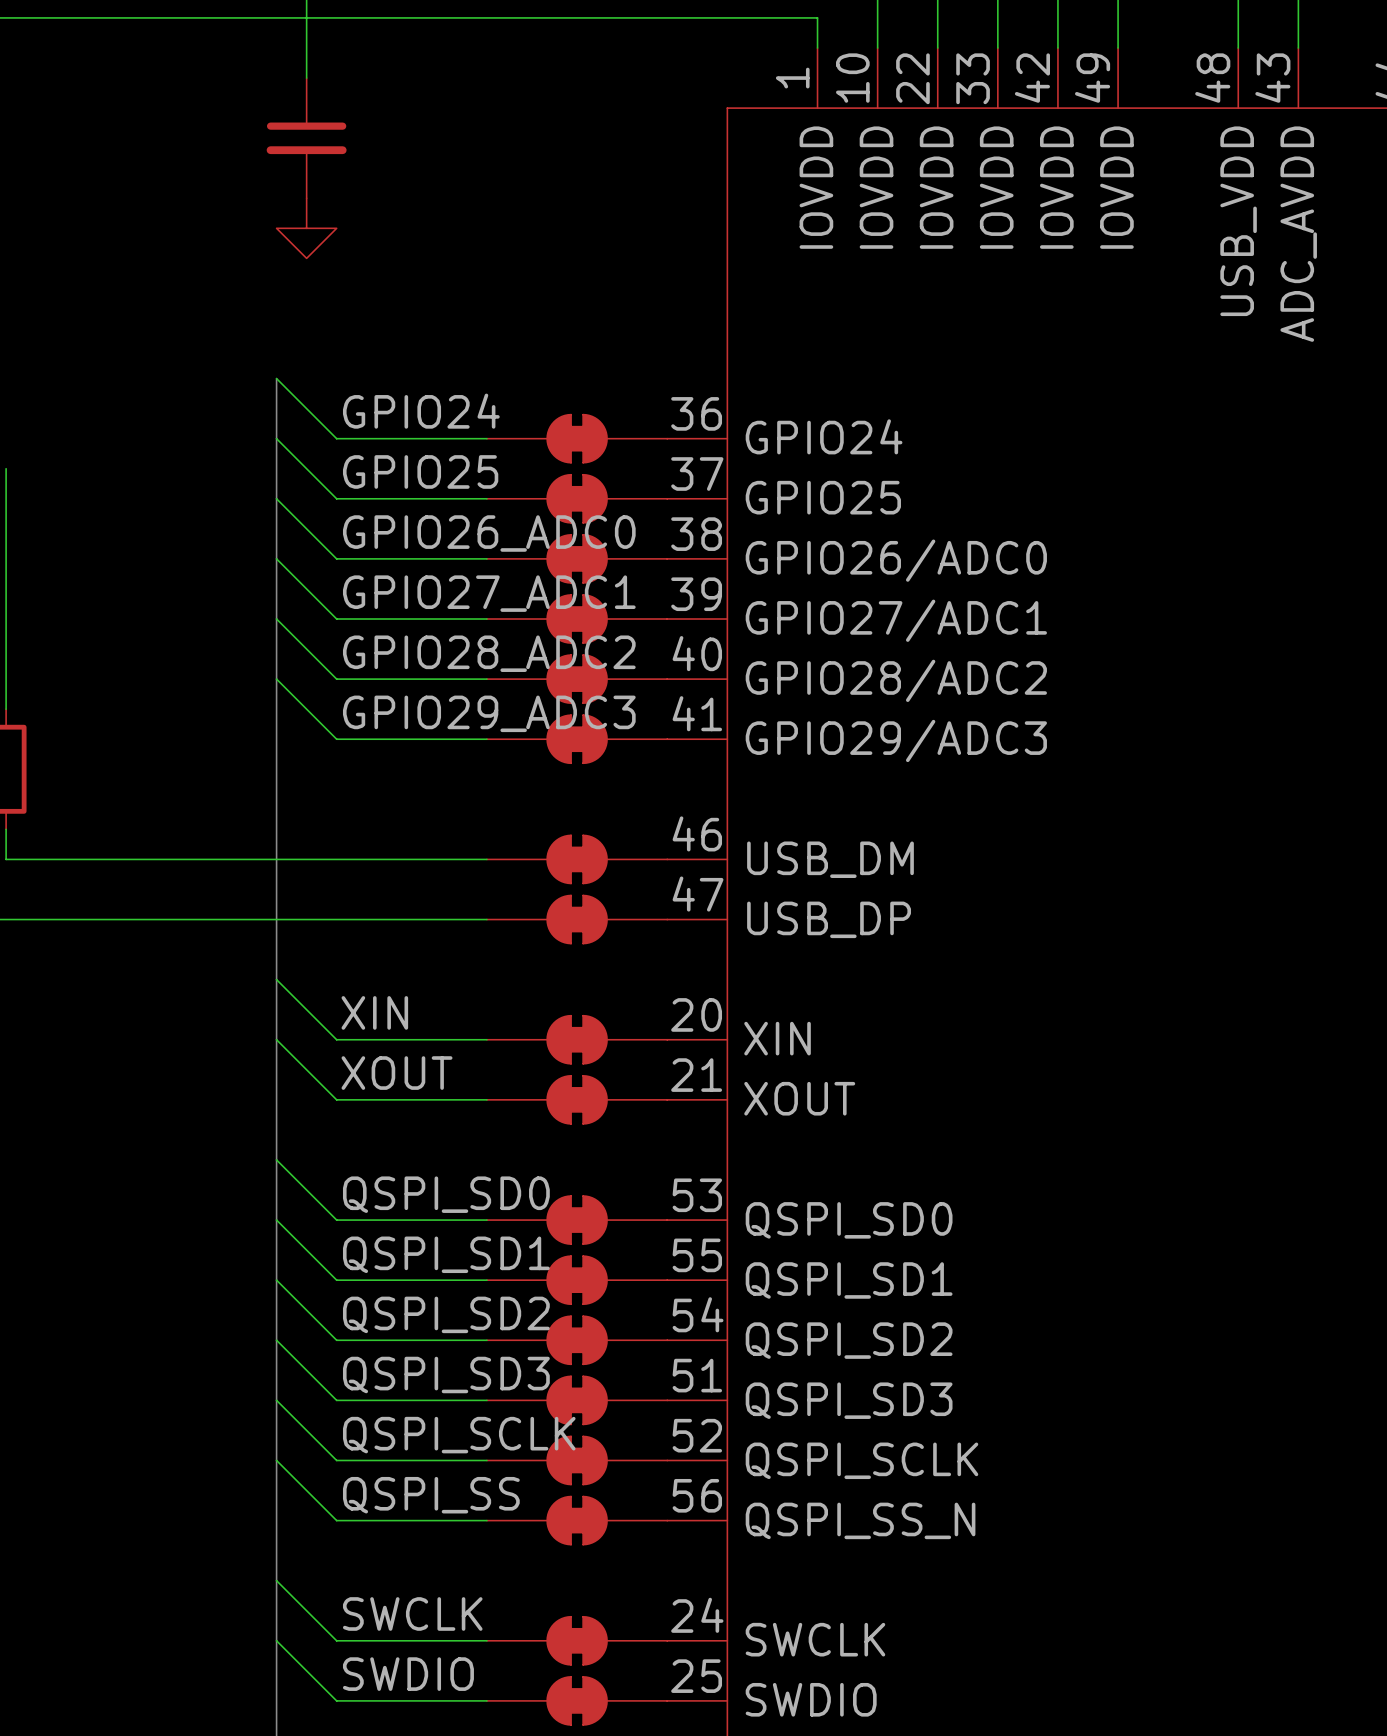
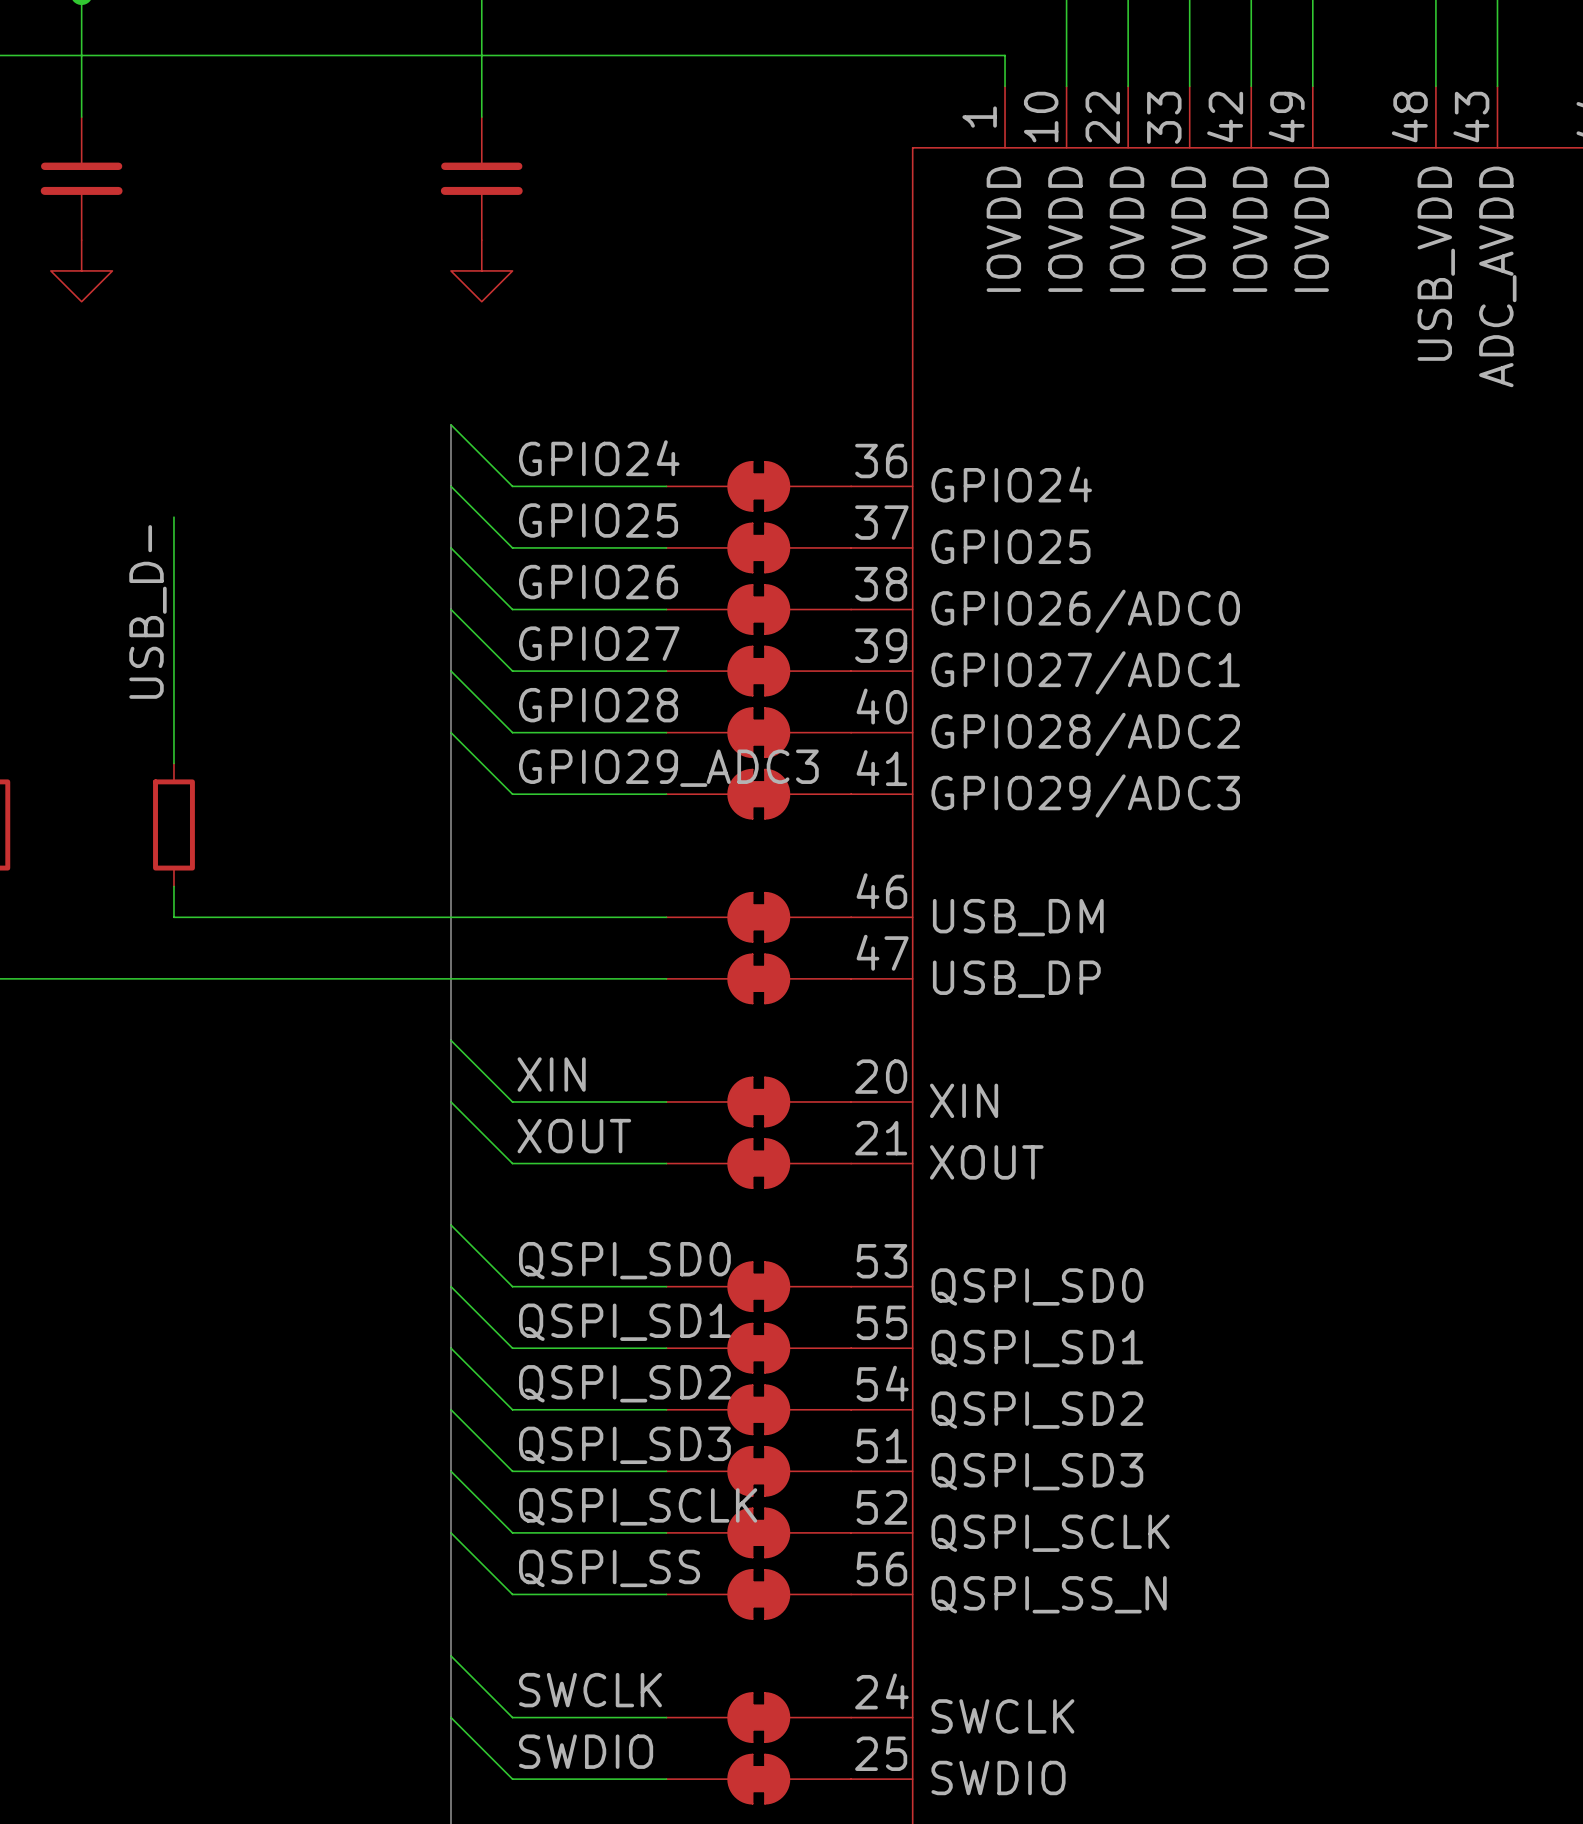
label: GPIO26_ADC0 (489, 533) -> GPIO26 (598, 582)
label: GPIO27_ADC1 (489, 593) -> GPIO27 (599, 643)
label: GPIO28_ADC2 (489, 653) -> GPIO28 (598, 705)

